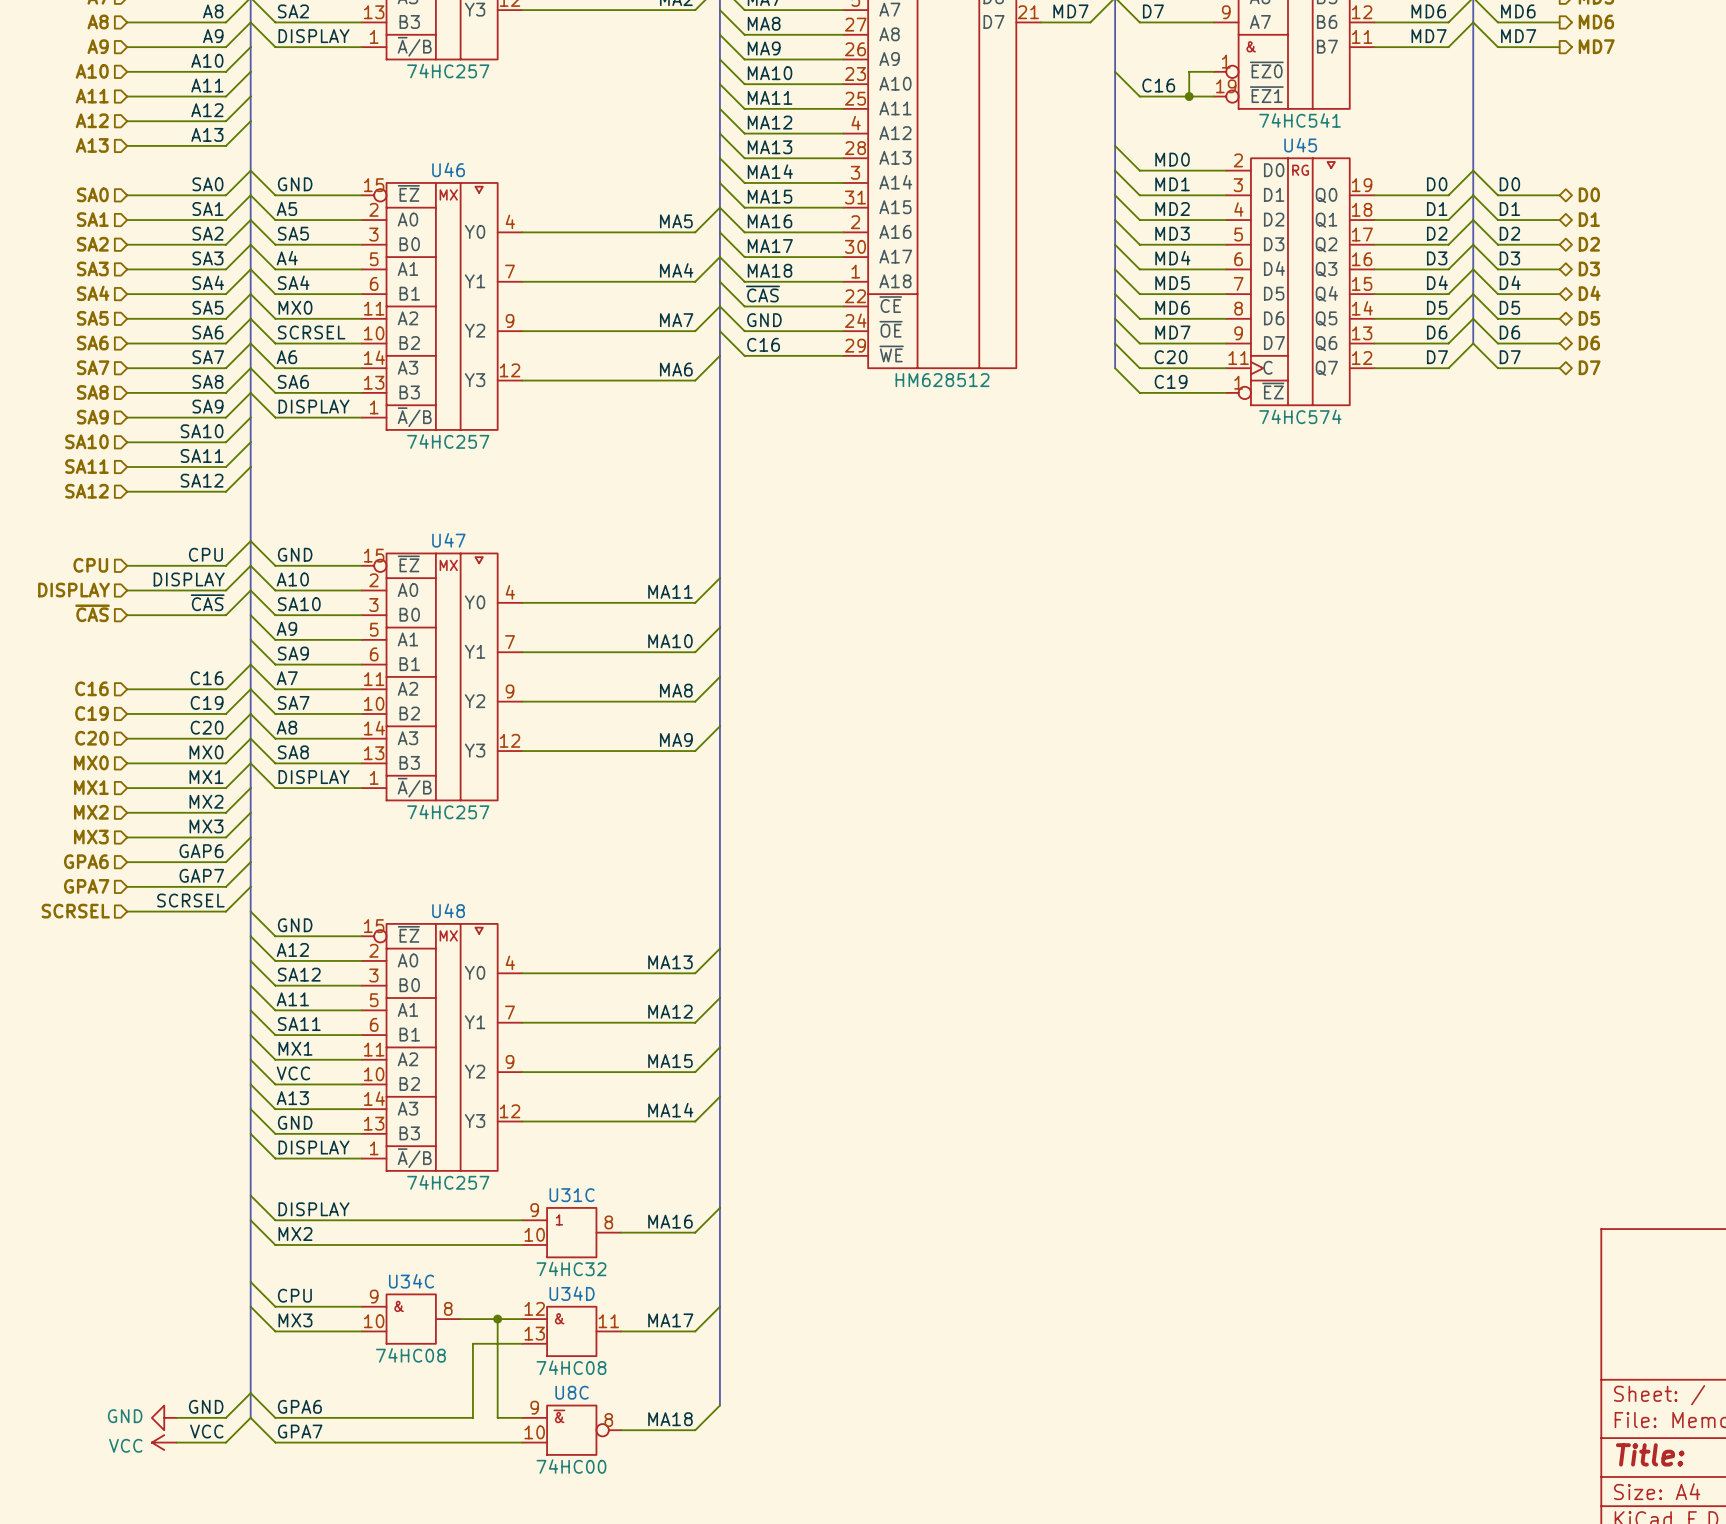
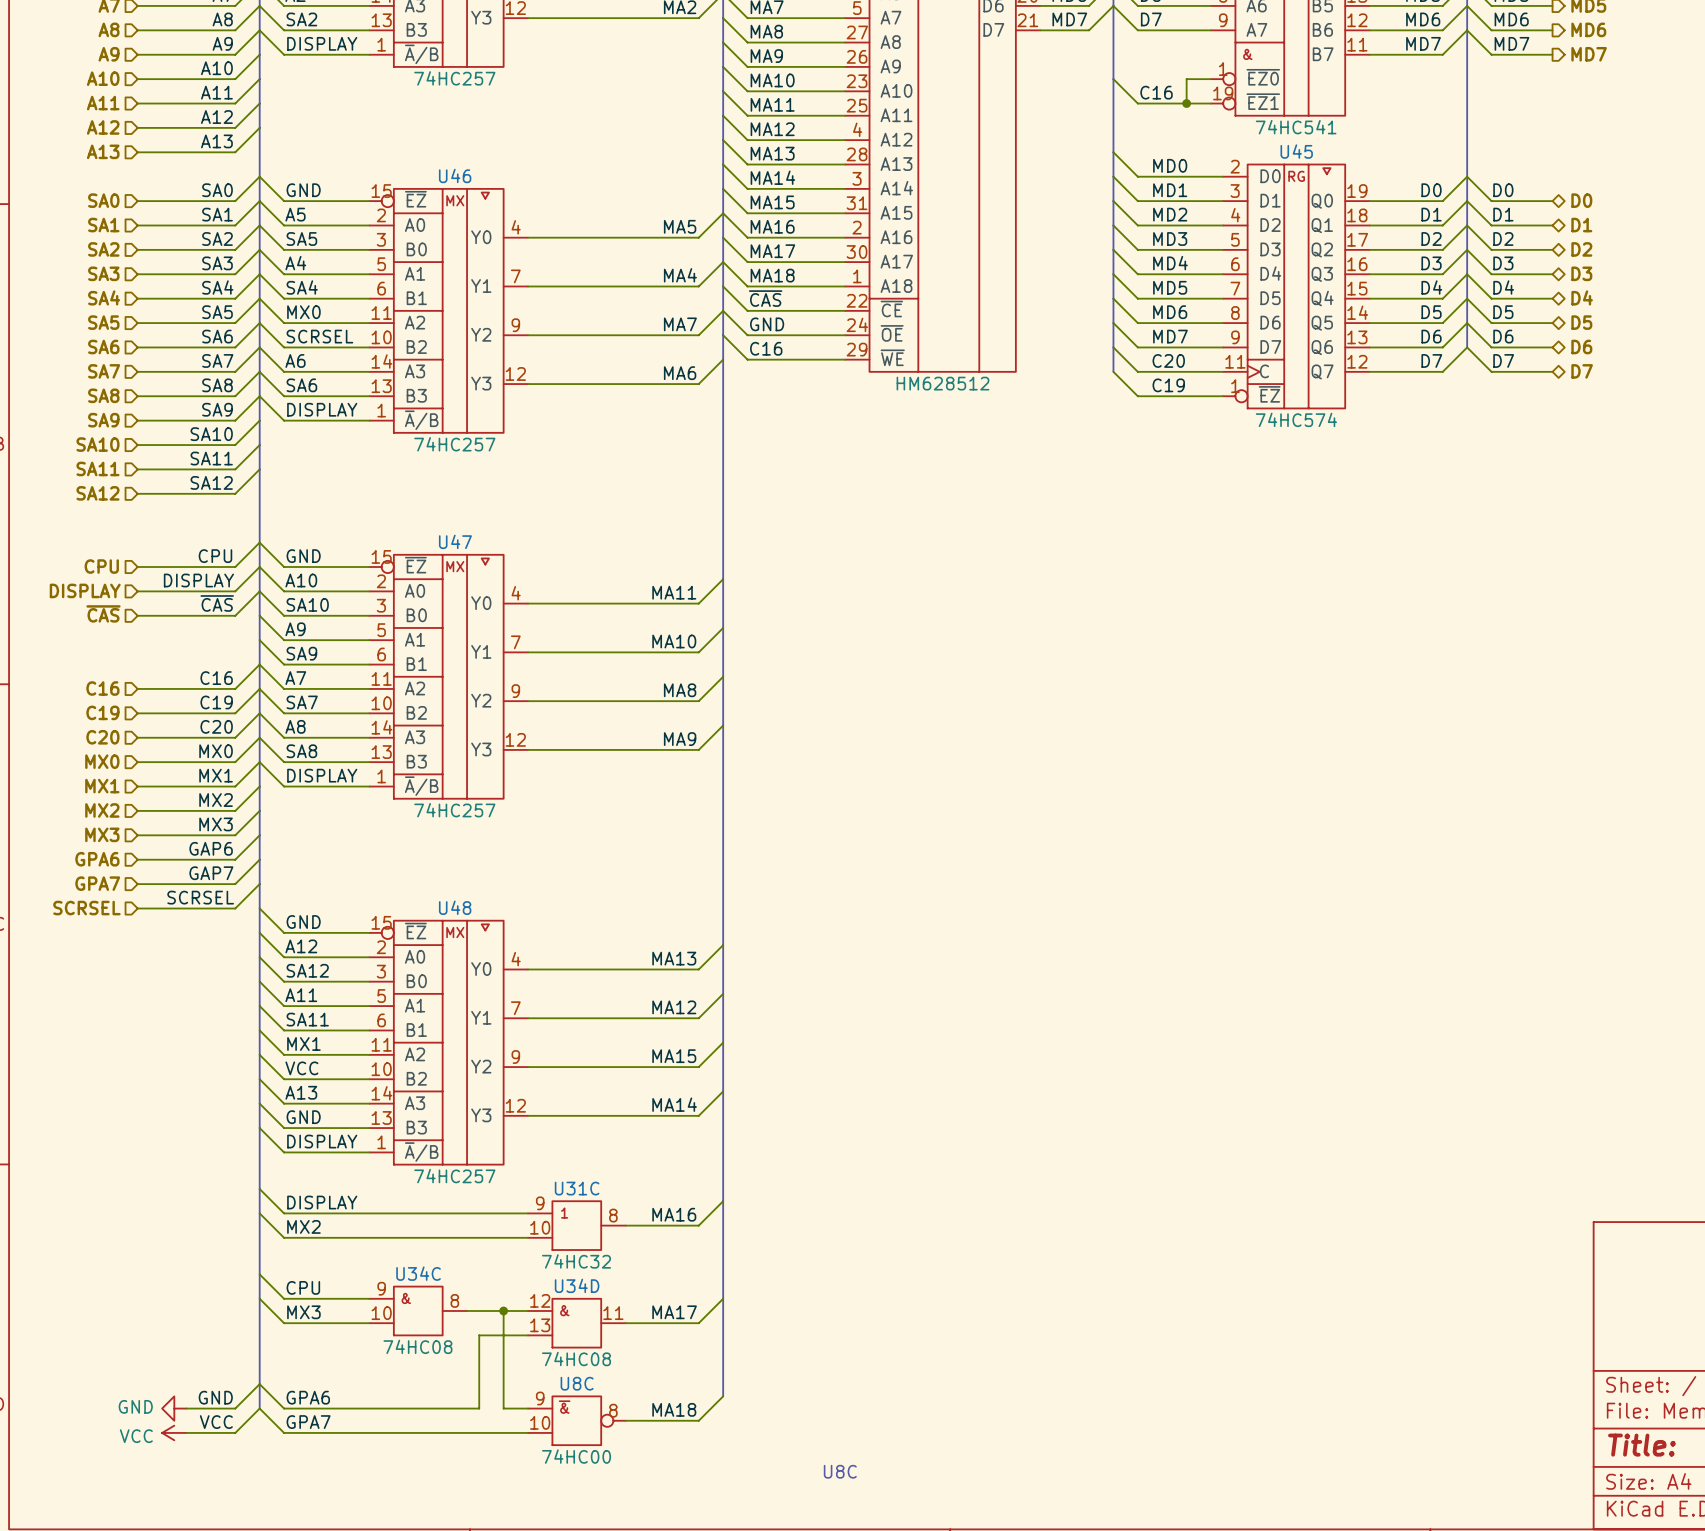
text: none -> U8C (840, 1471)

